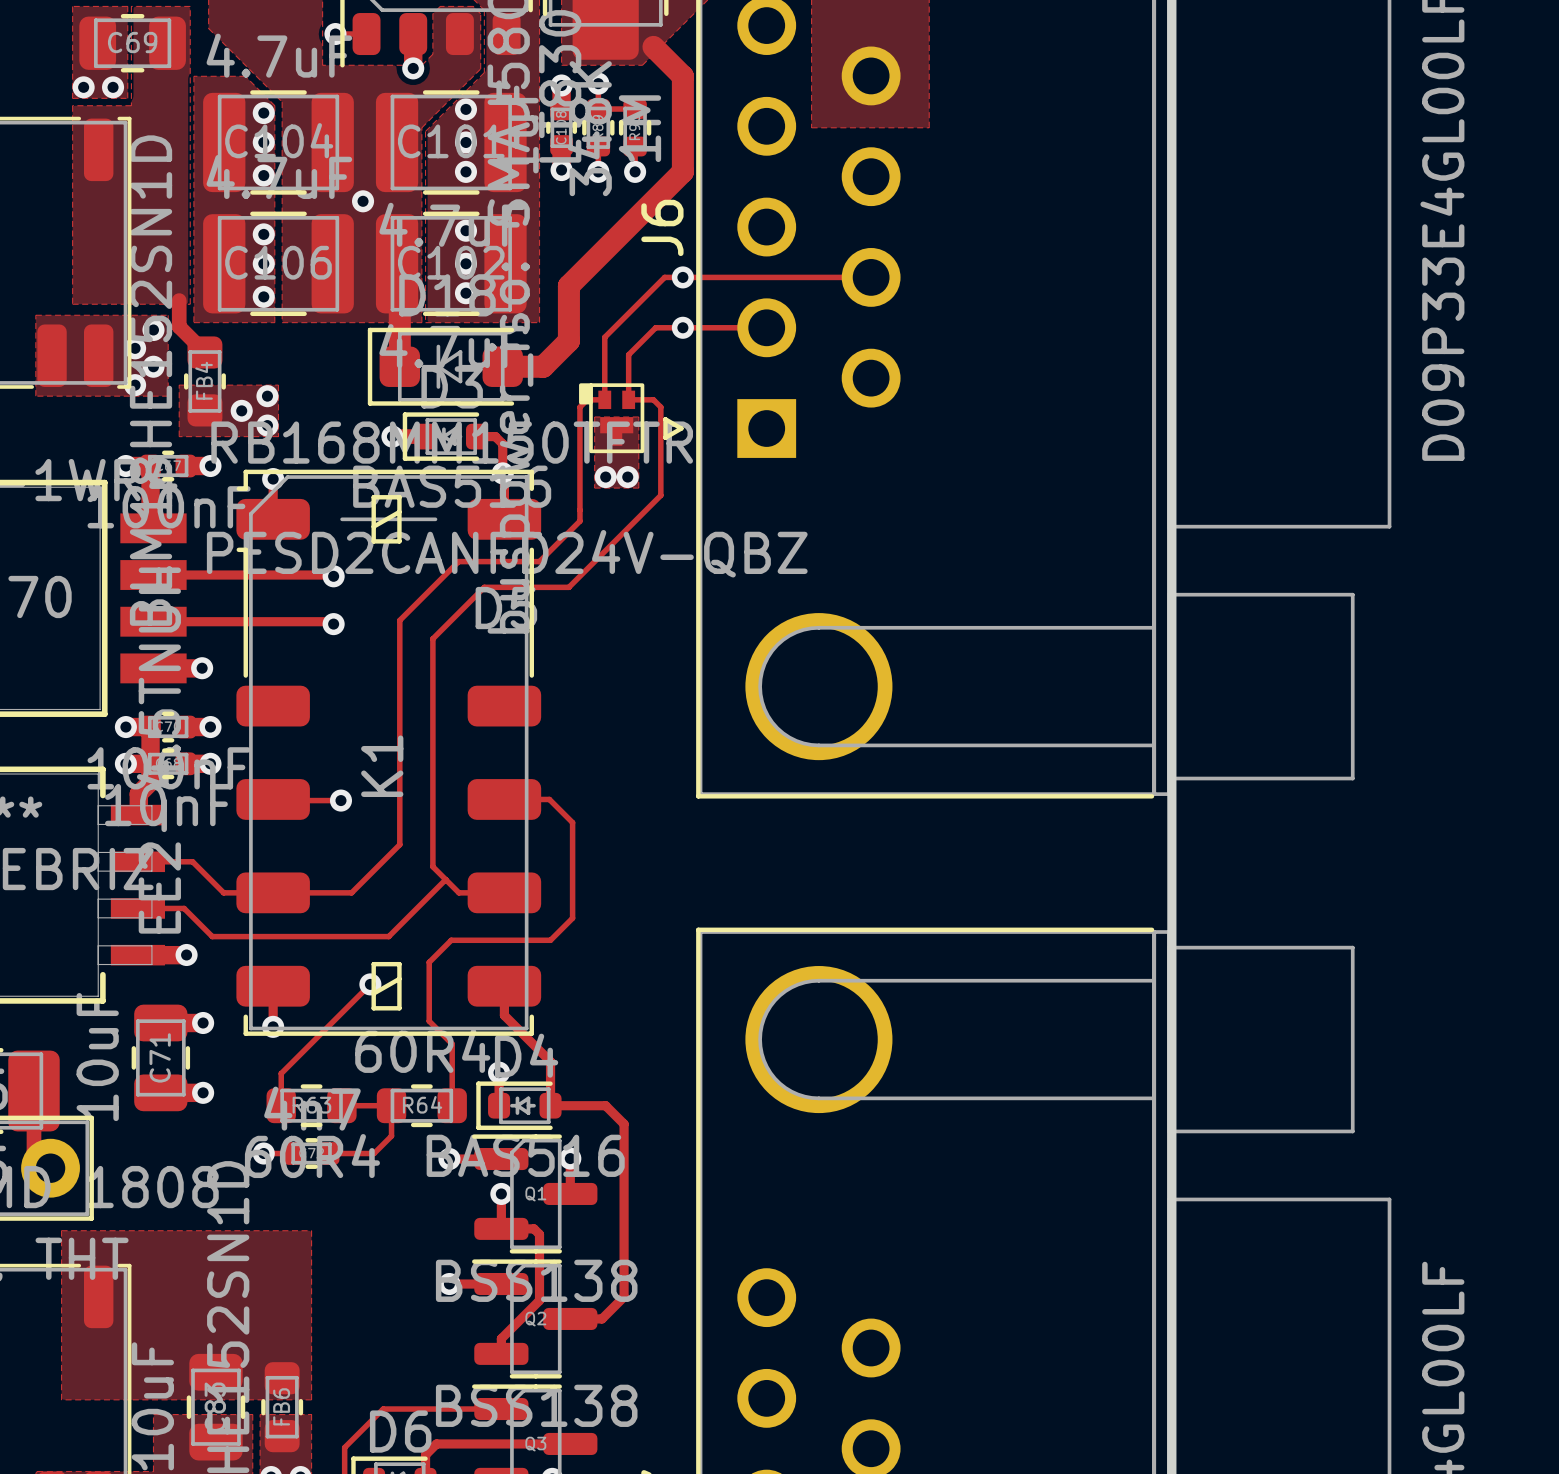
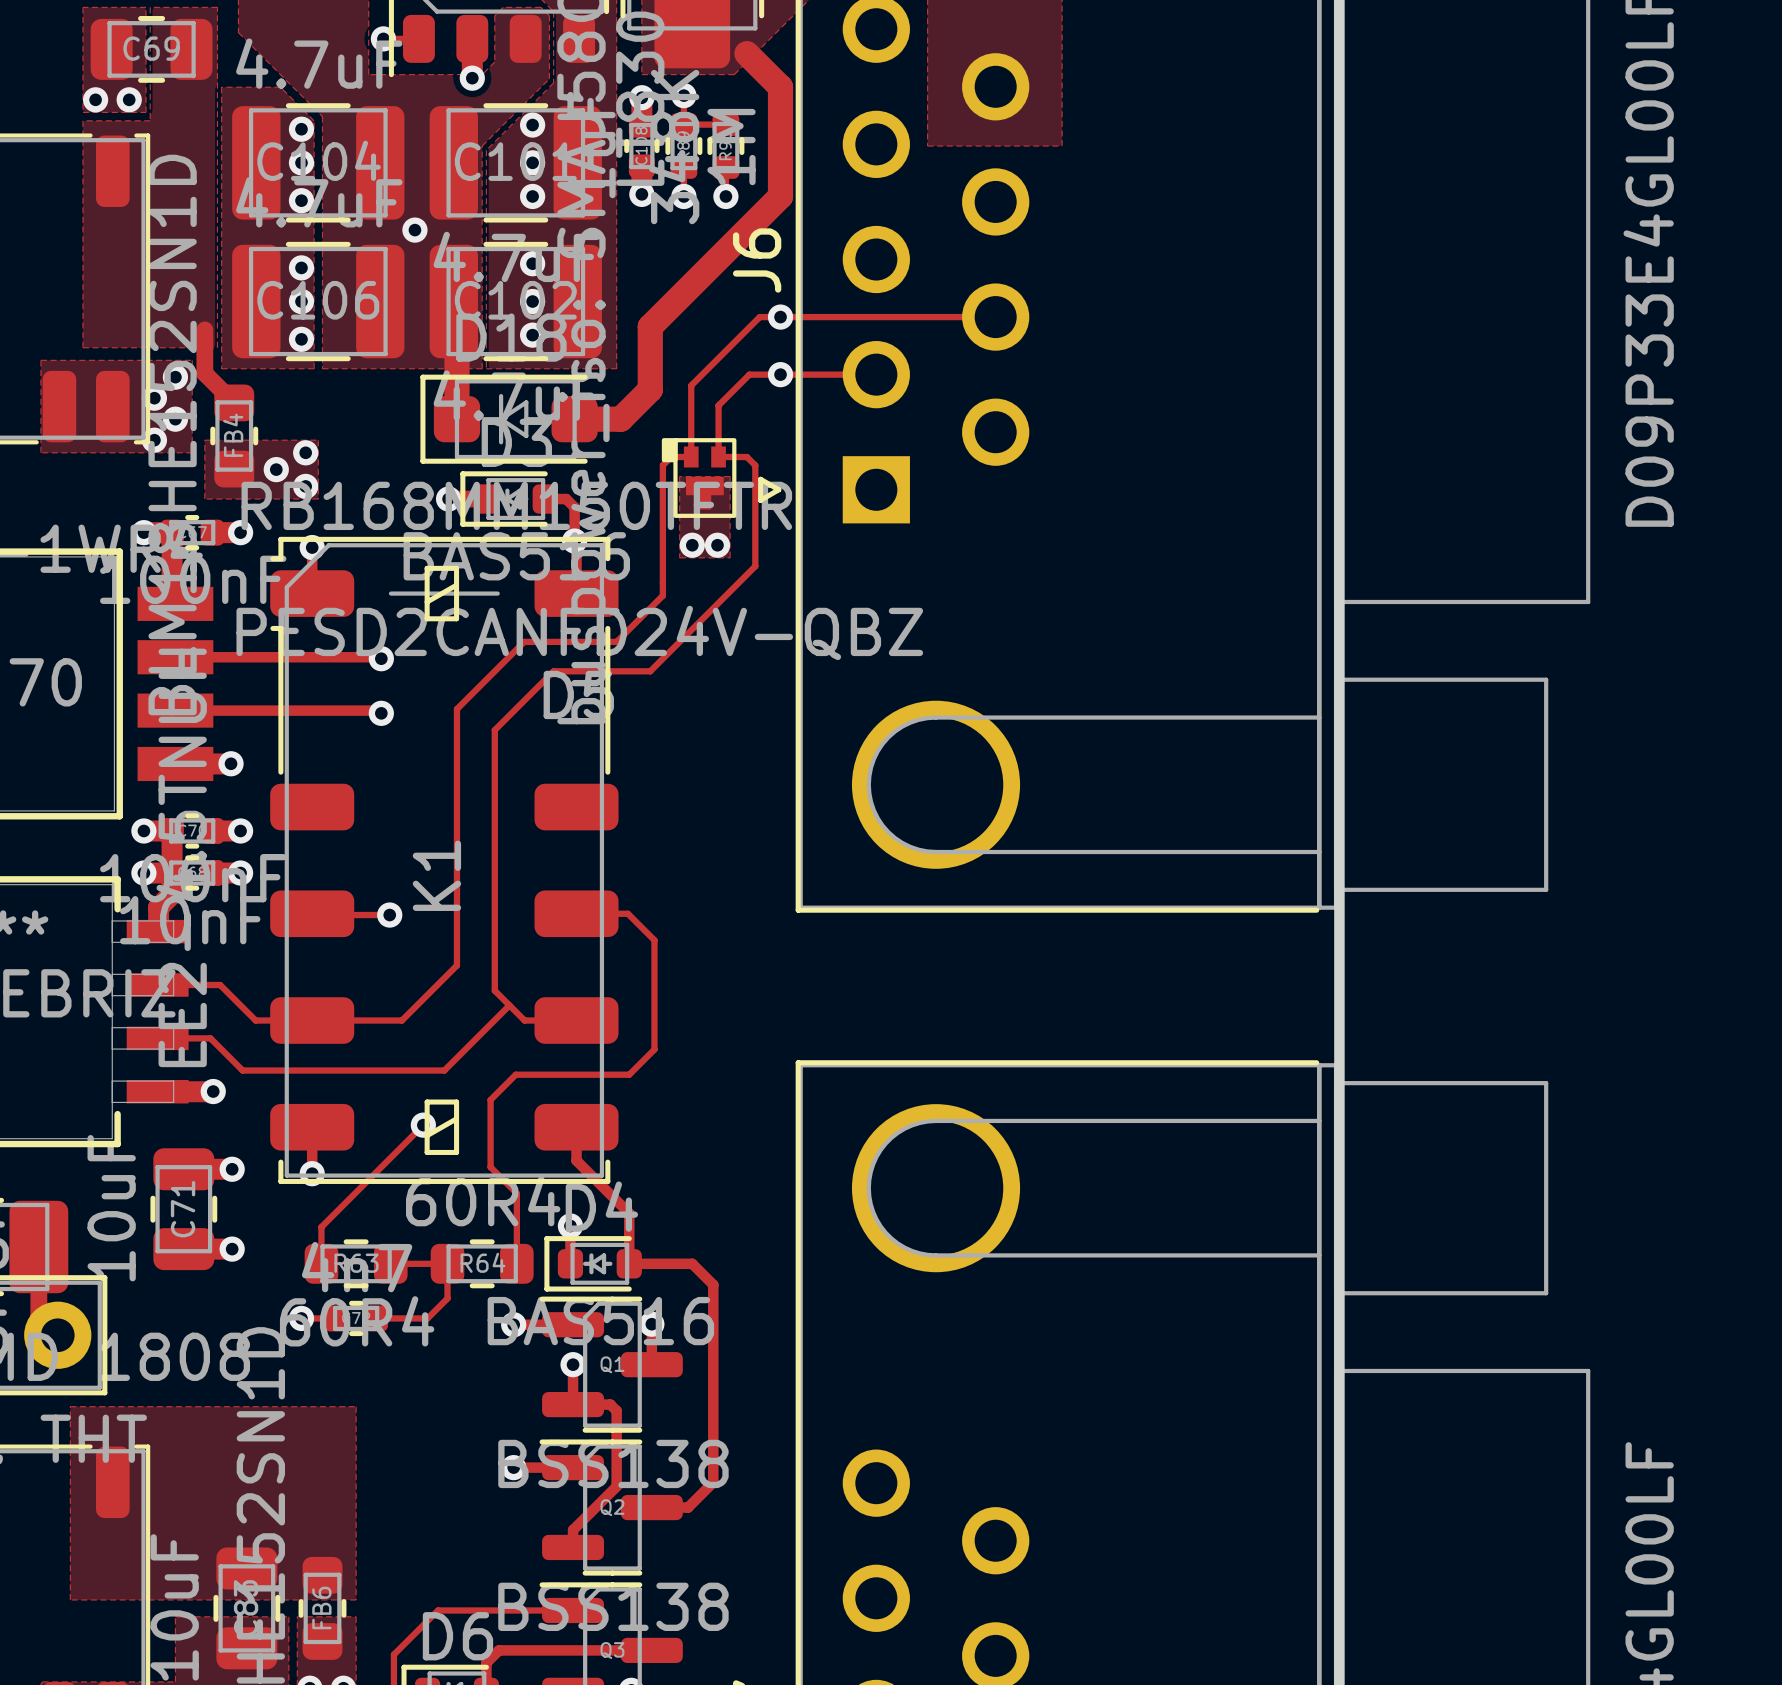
track: none -> (204, 329) (204, 343)

